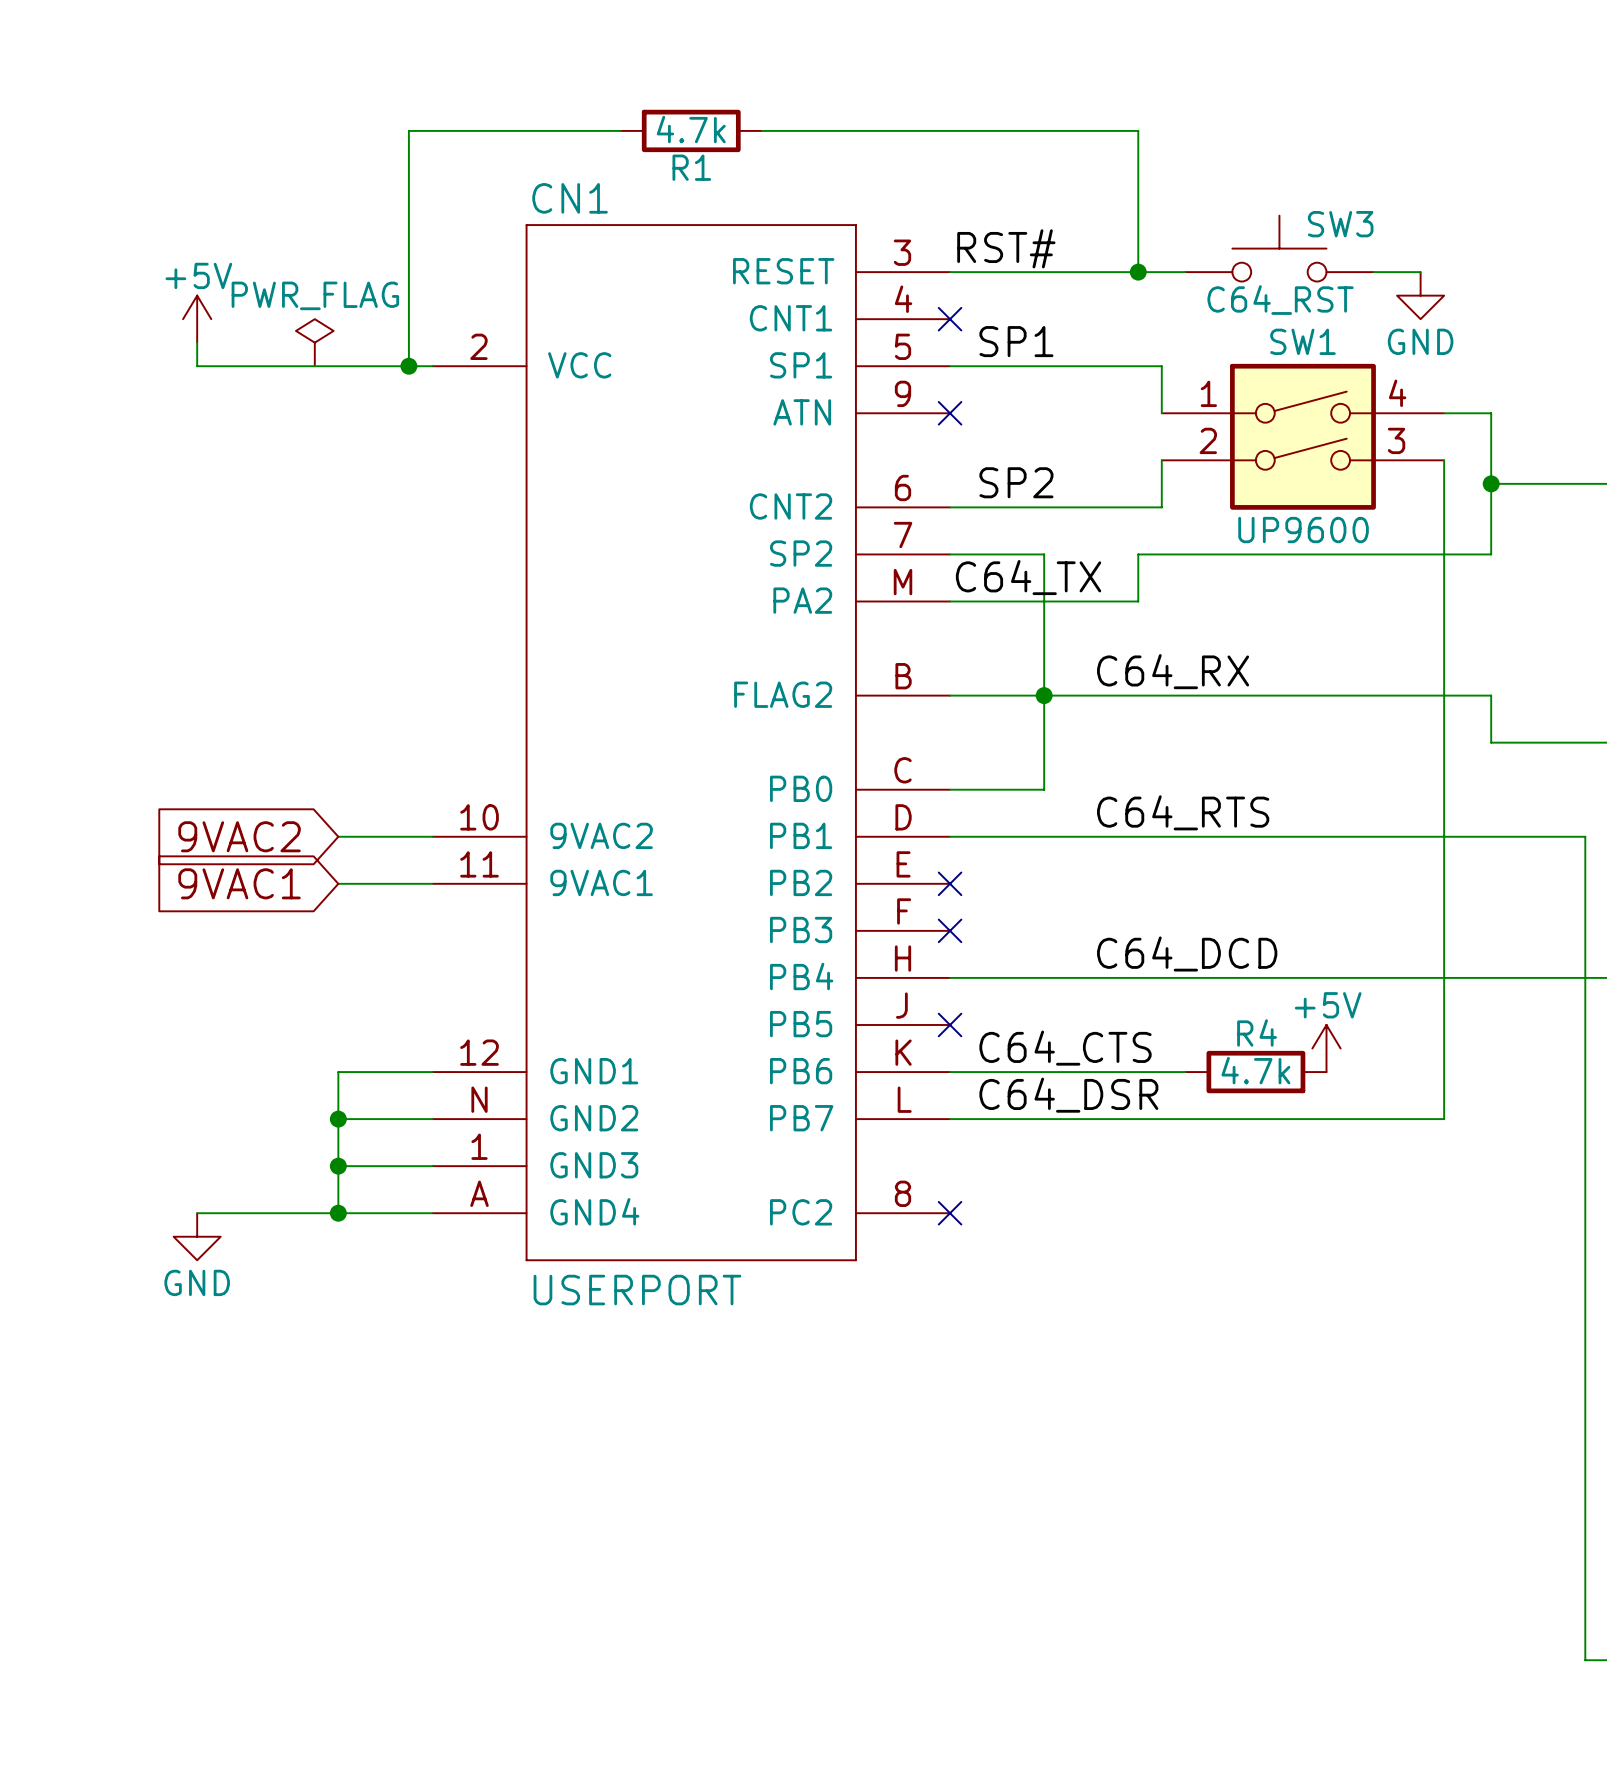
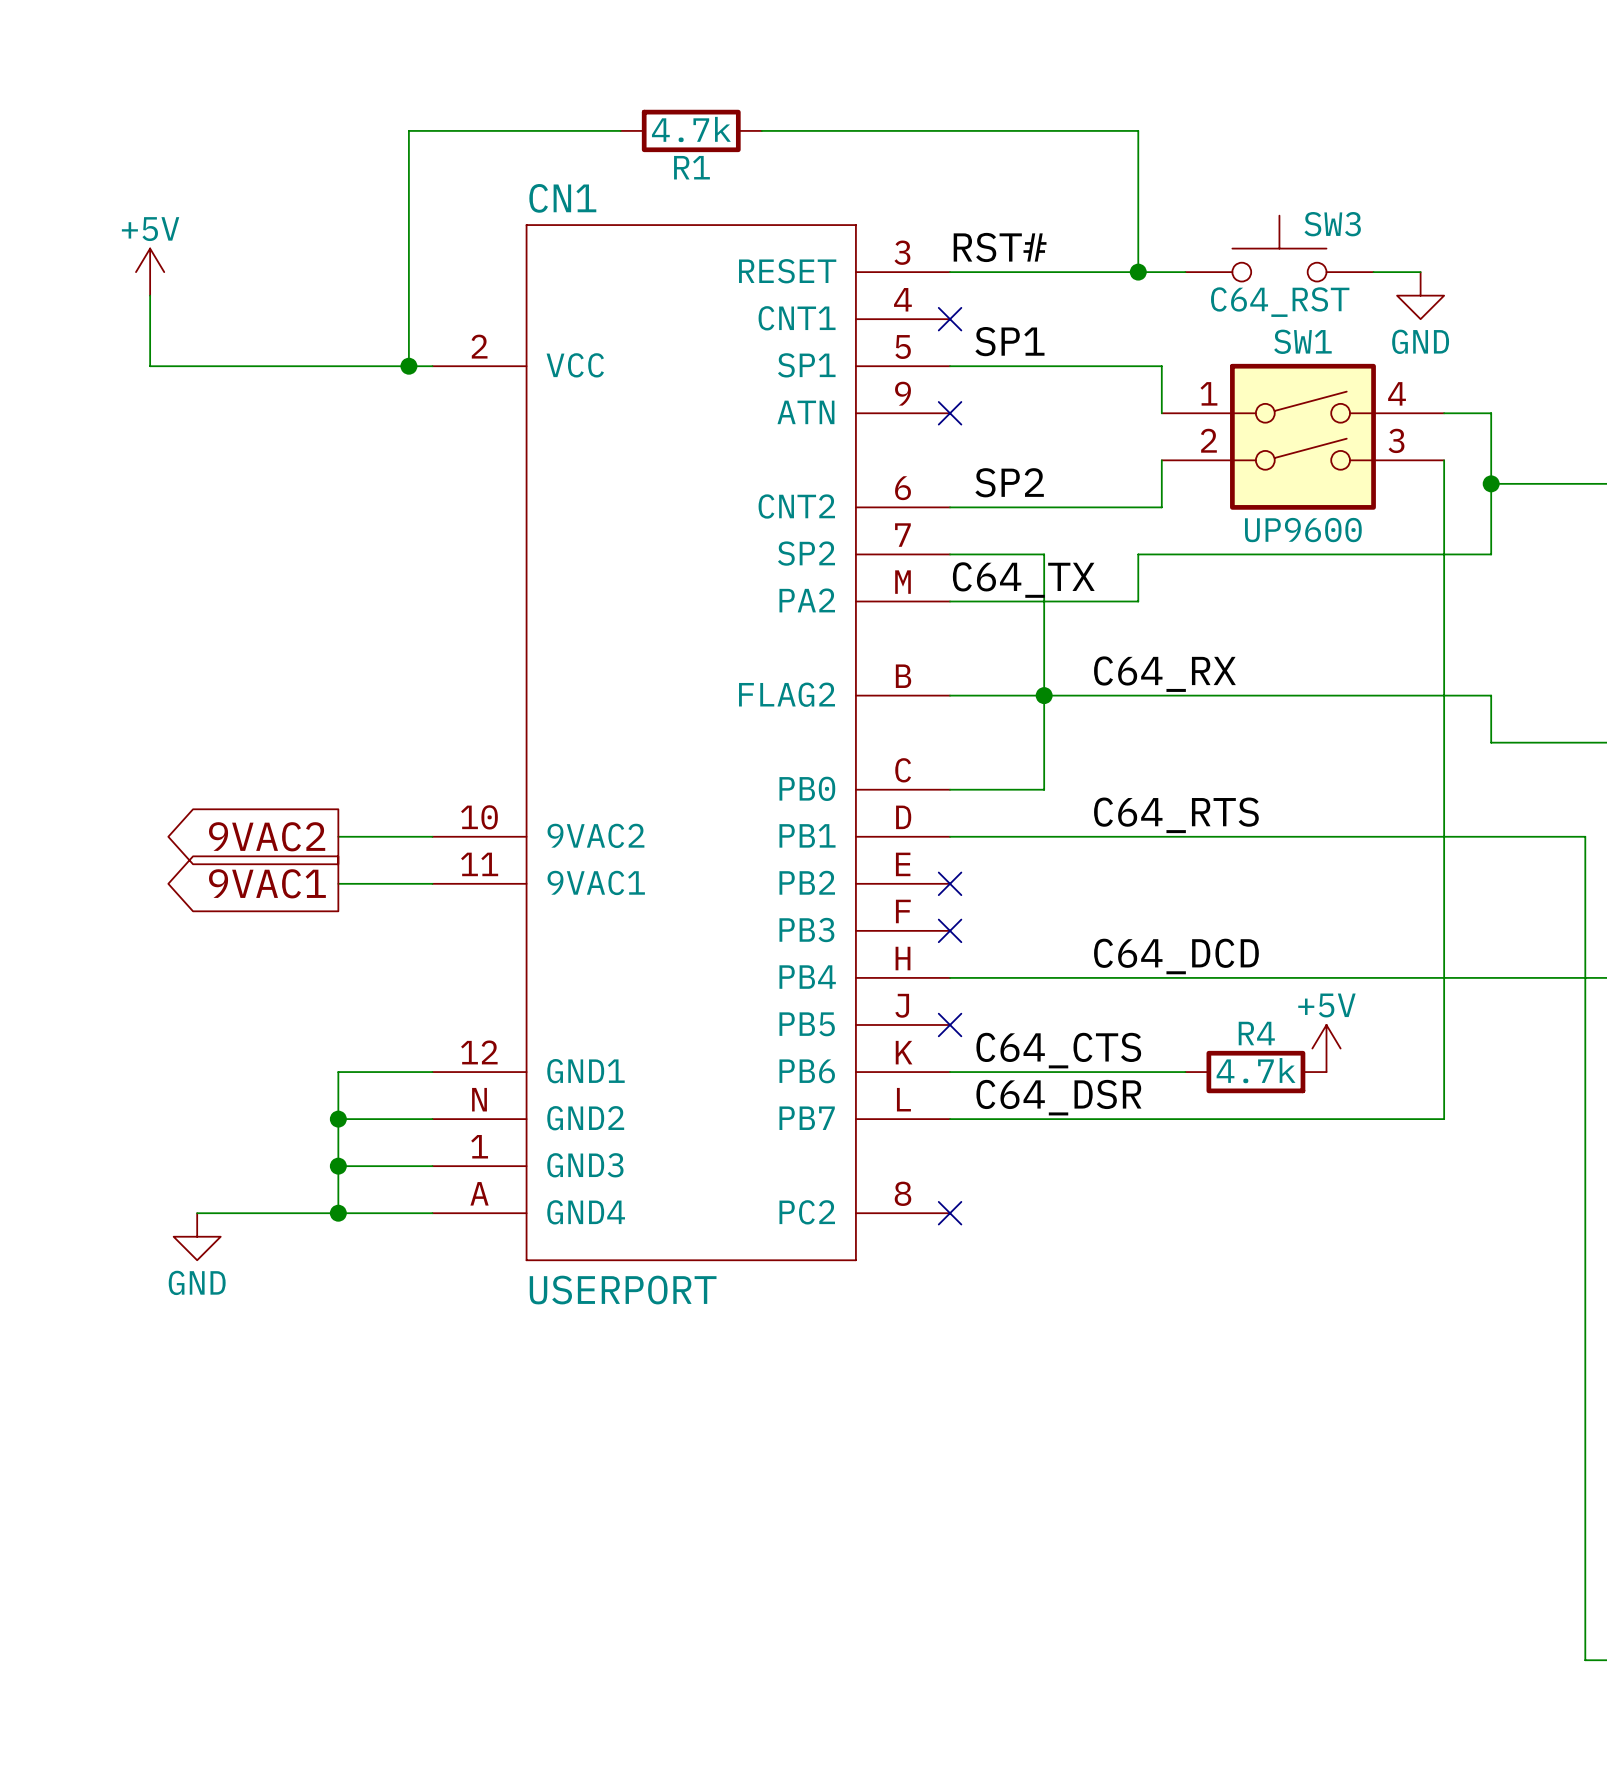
power symbol position: +5V (197, 319) -> +5V (150, 272)
wire: (197, 342) (197, 366) -> (150, 295) (150, 366) (197, 366)
power symbol: PWR_FLAG (314, 342) -> none
global label shape: input (239, 836) -> output (267, 836)
global label shape: input (239, 883) -> output (267, 883)

